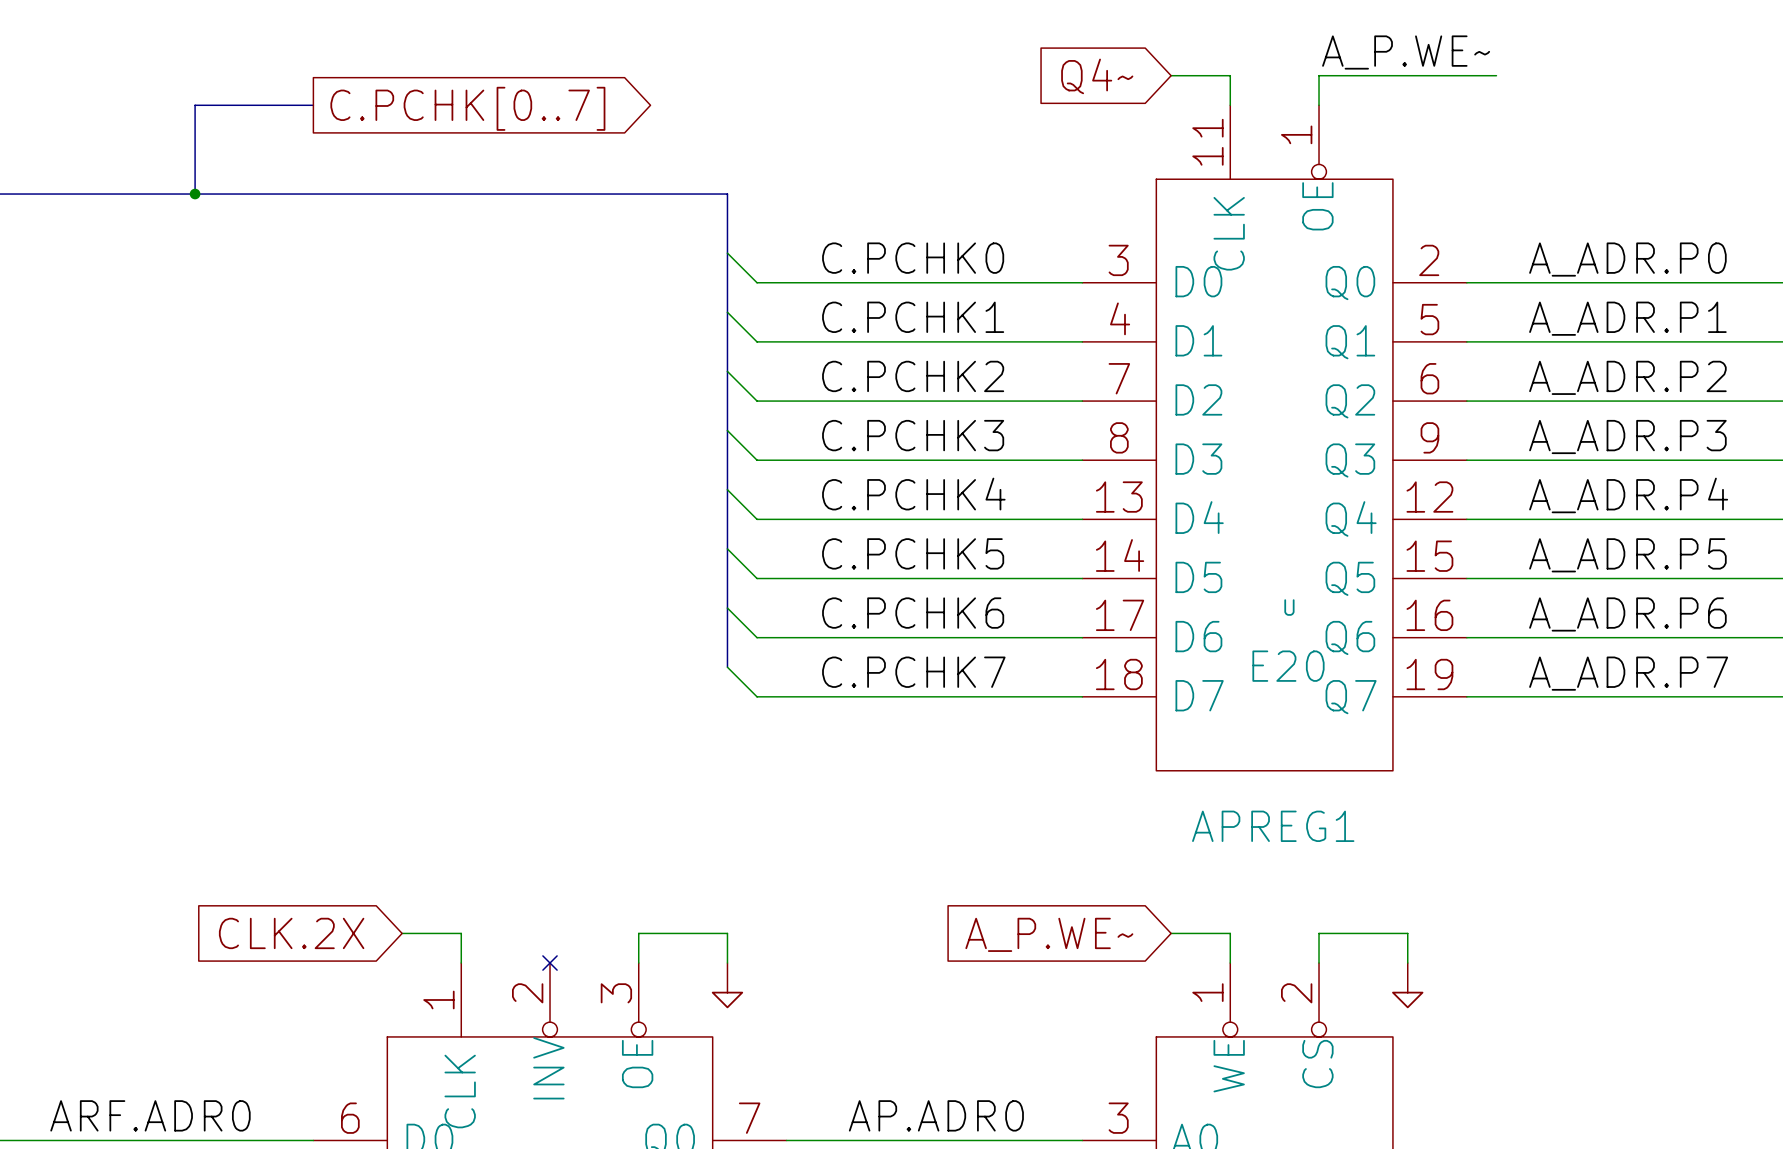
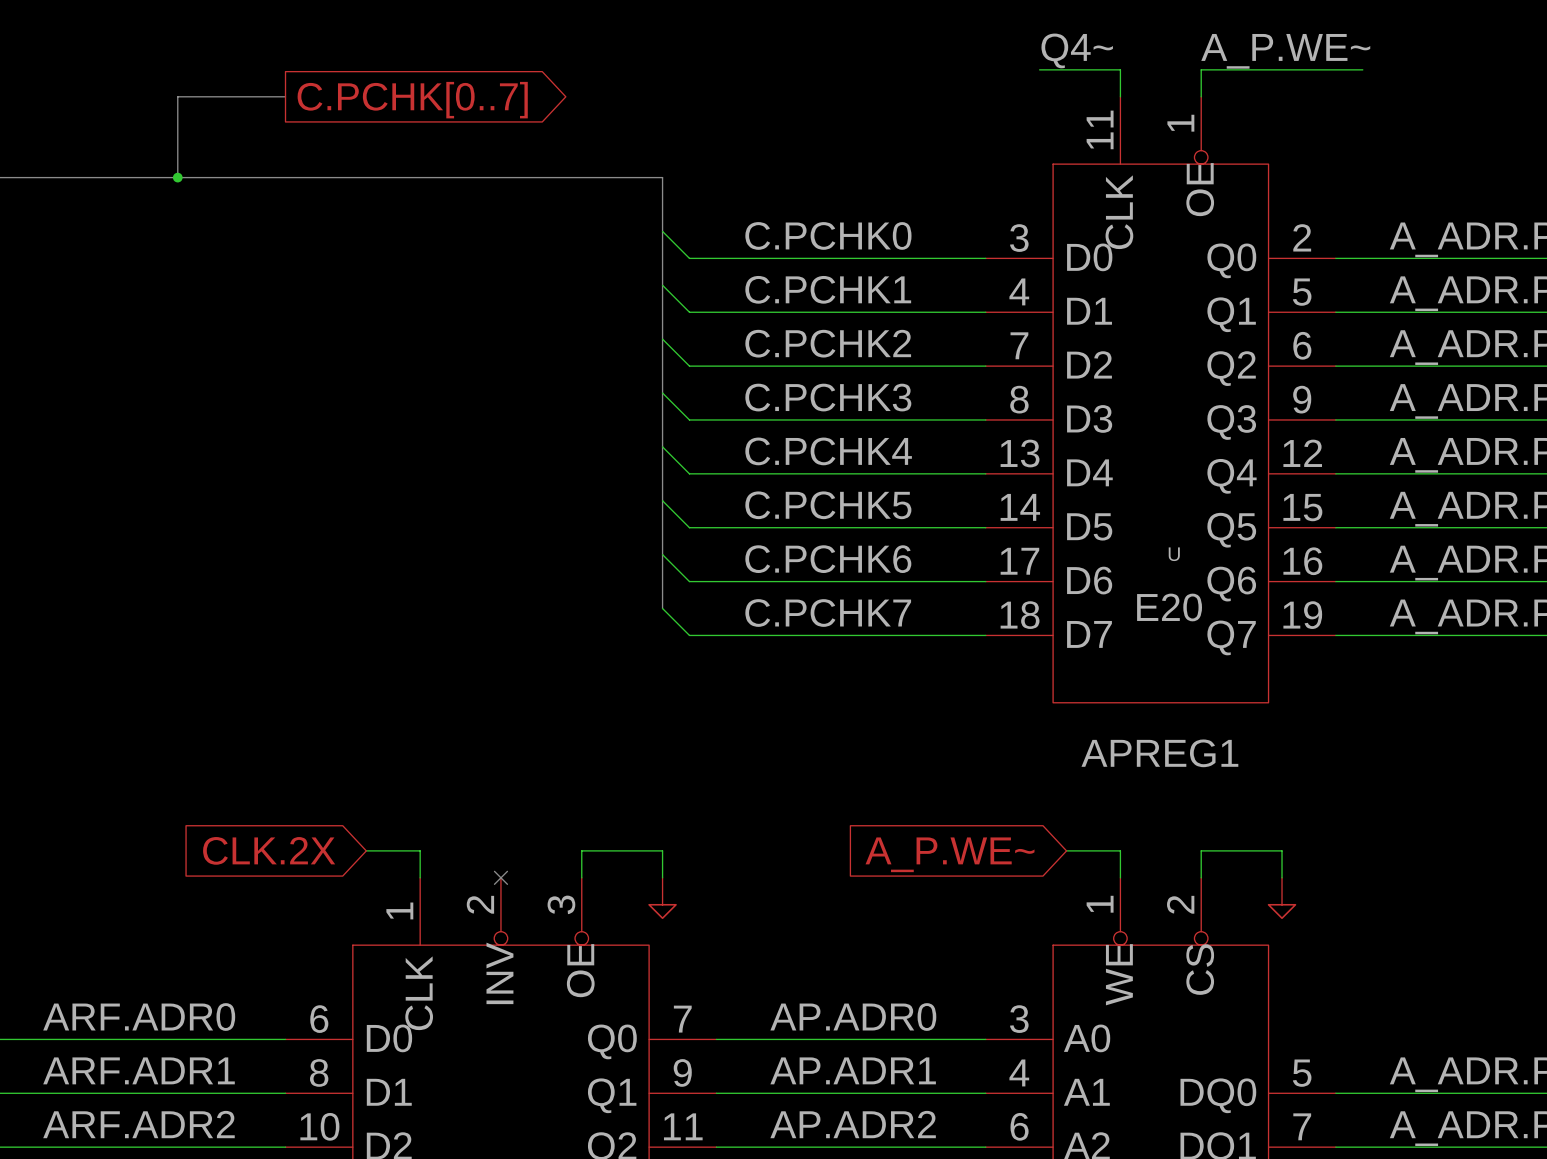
label: none -> Q4~ (1077, 50)
wire: none -> (1039, 69) (1066, 69)
global label: Q4~ (1097, 76) -> none

